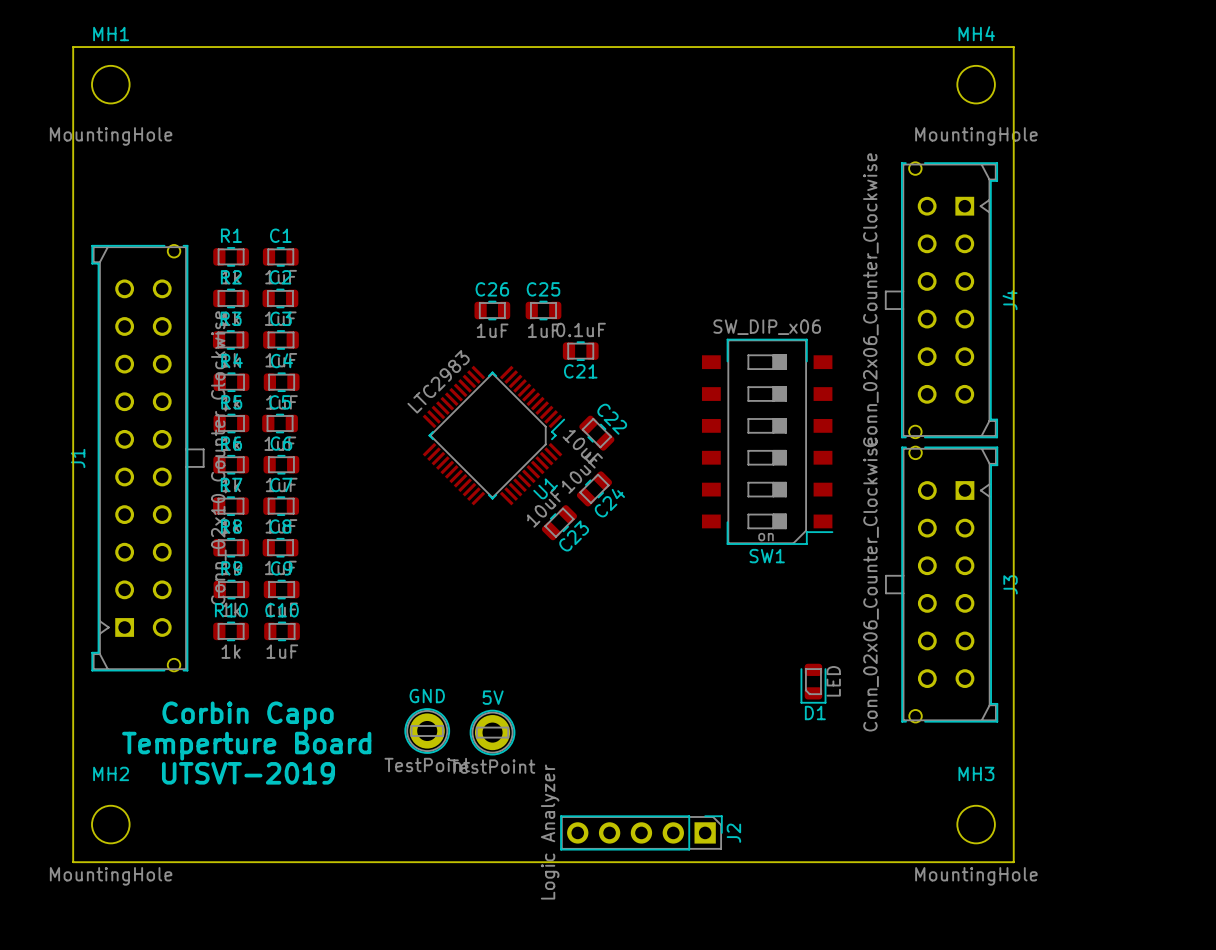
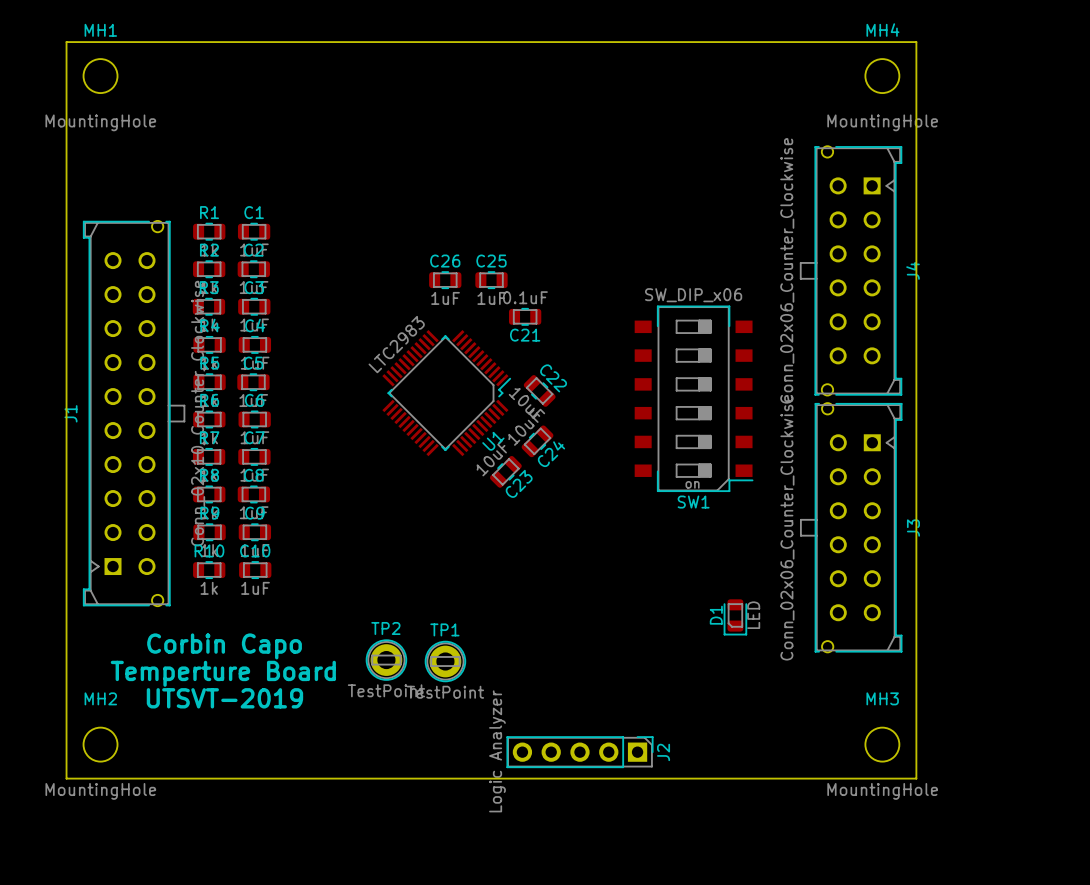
GND name: GND (427, 696) -> TP2 (385, 628)
5V name: 5V (493, 697) -> TP1 (444, 629)
D1 name rotation: 0° (815, 713) -> 90° counterclockwise (716, 615)
D1 name position: D1 (815, 713) -> D1 (716, 615)

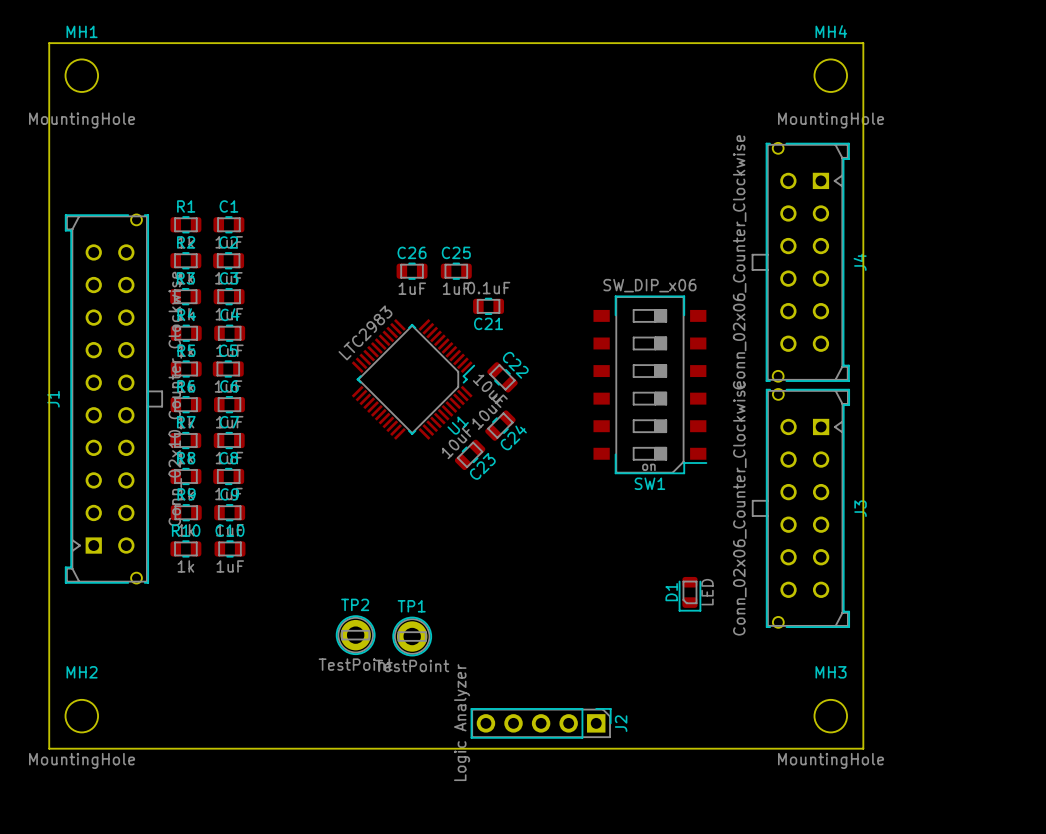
text: Corbin Capo (224, 646) -> none
text: Temperture Board (223, 673) -> none
text: UTSVT-2019 (224, 698) -> none

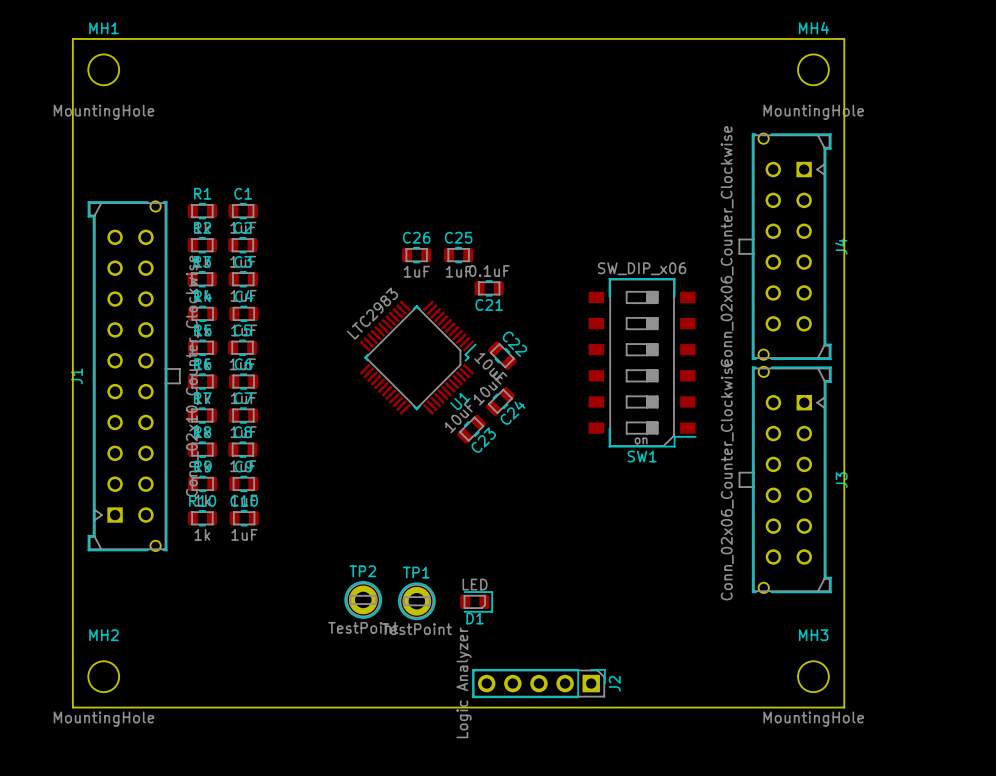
D1 rotation: 0° (689, 594) -> 90° counterclockwise (476, 601)
D1 position: (689, 594) -> (476, 601)

